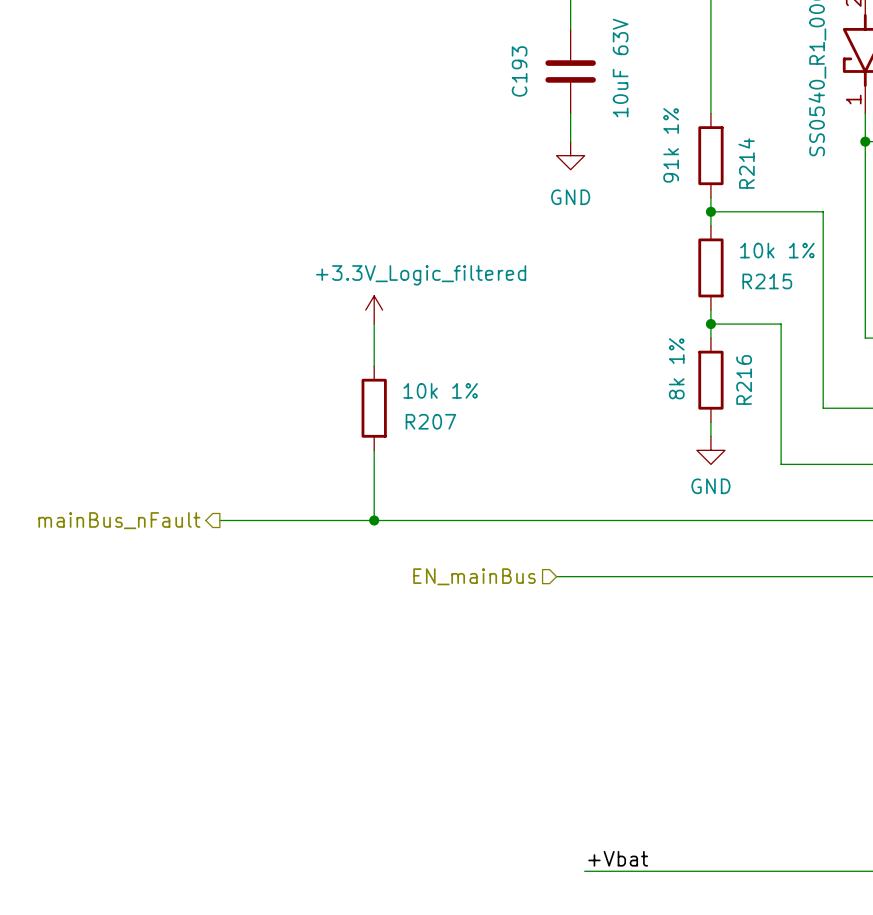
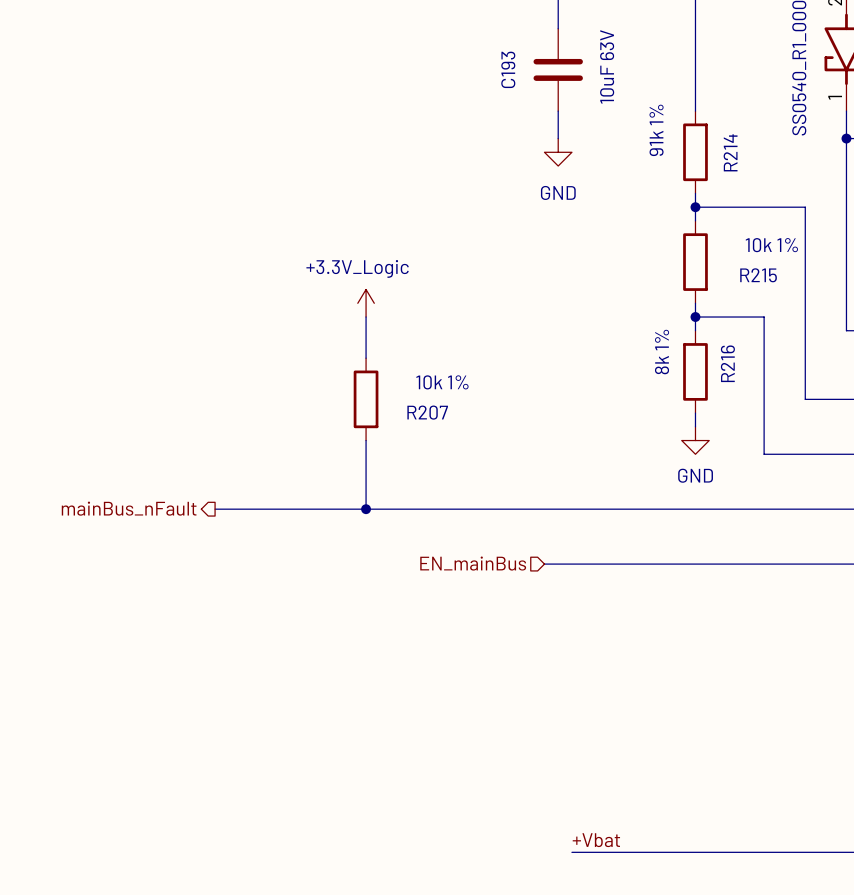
power symbol: +3.3V_Logic_filtered (374, 310) -> +3.3V_Logic (366, 303)

